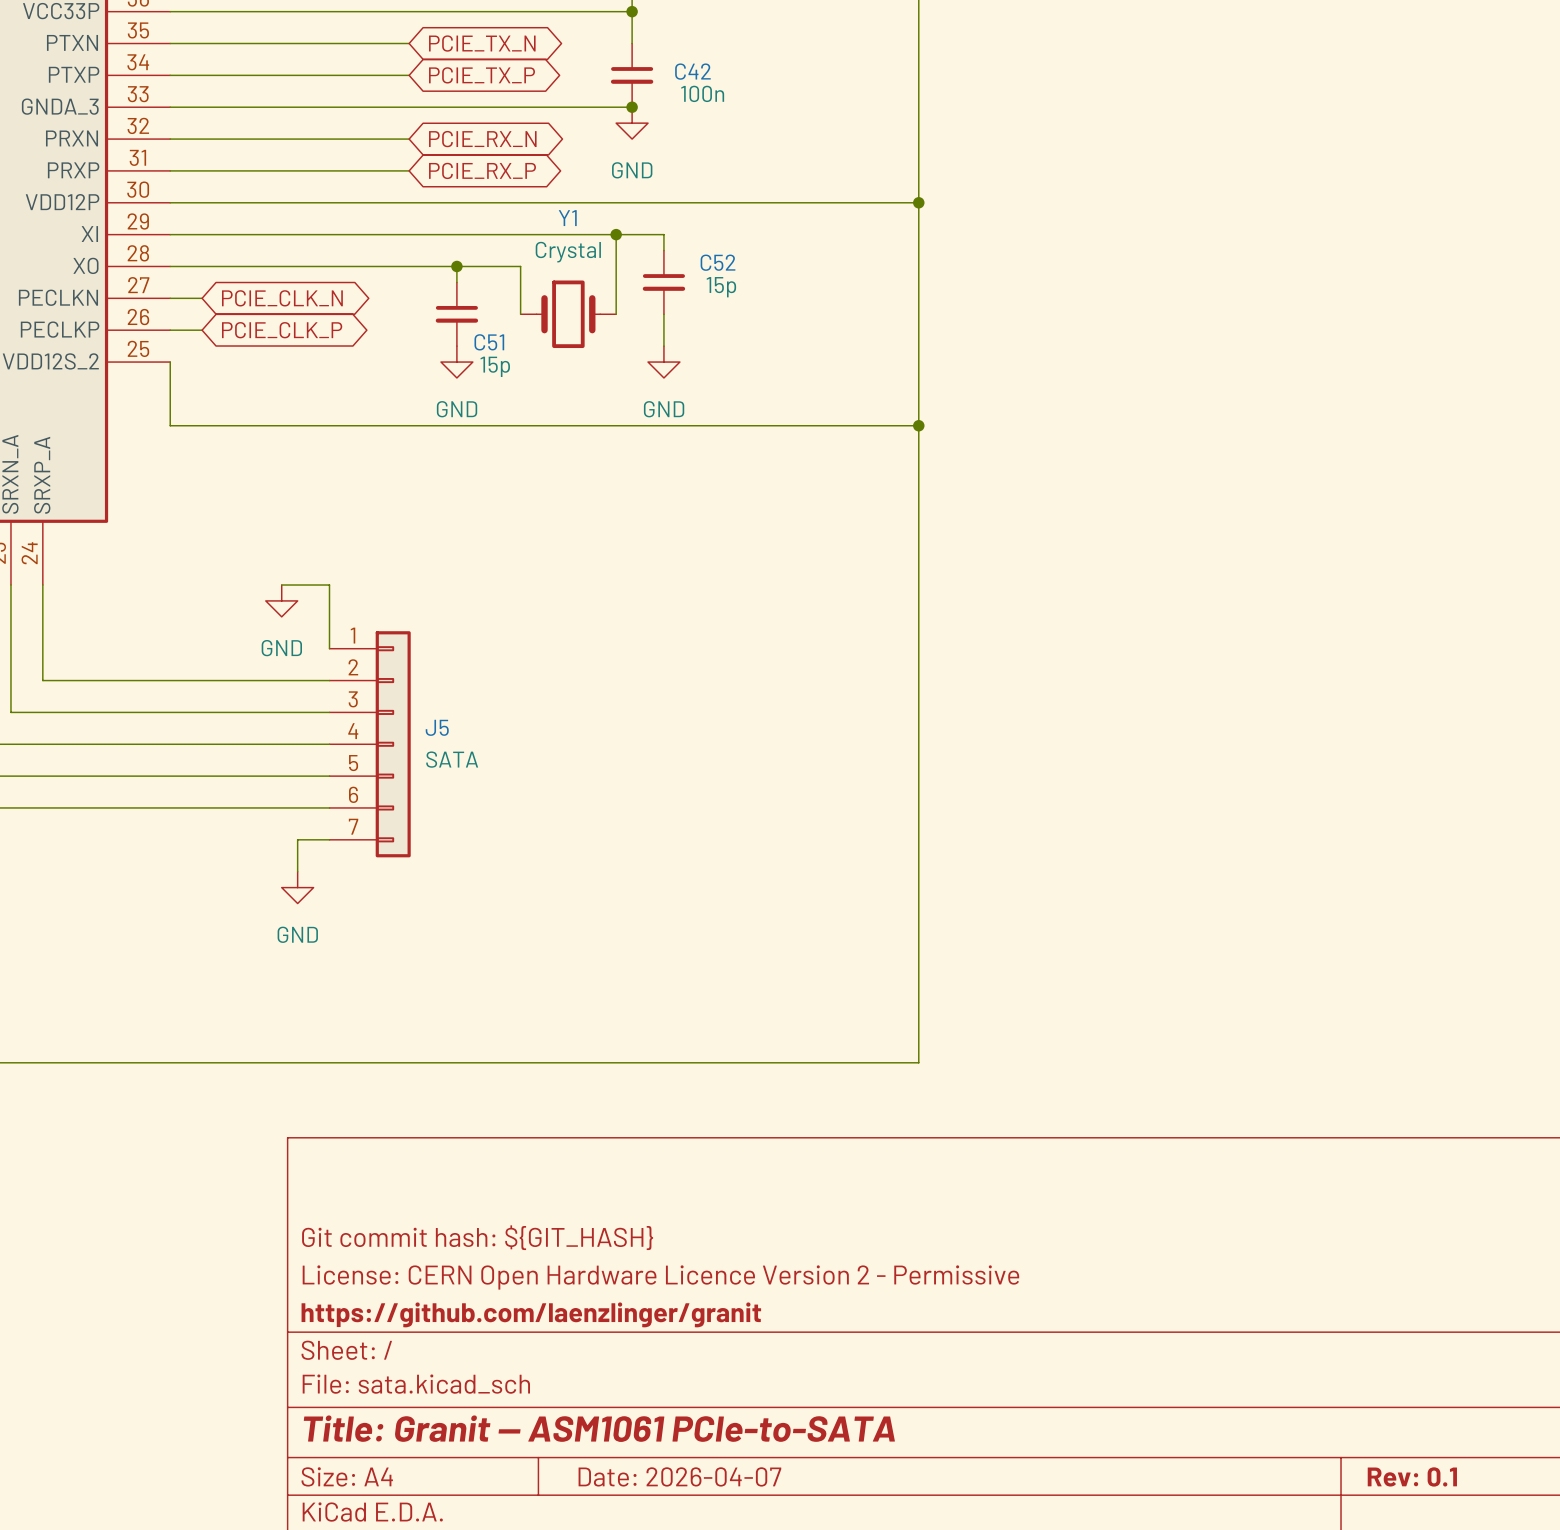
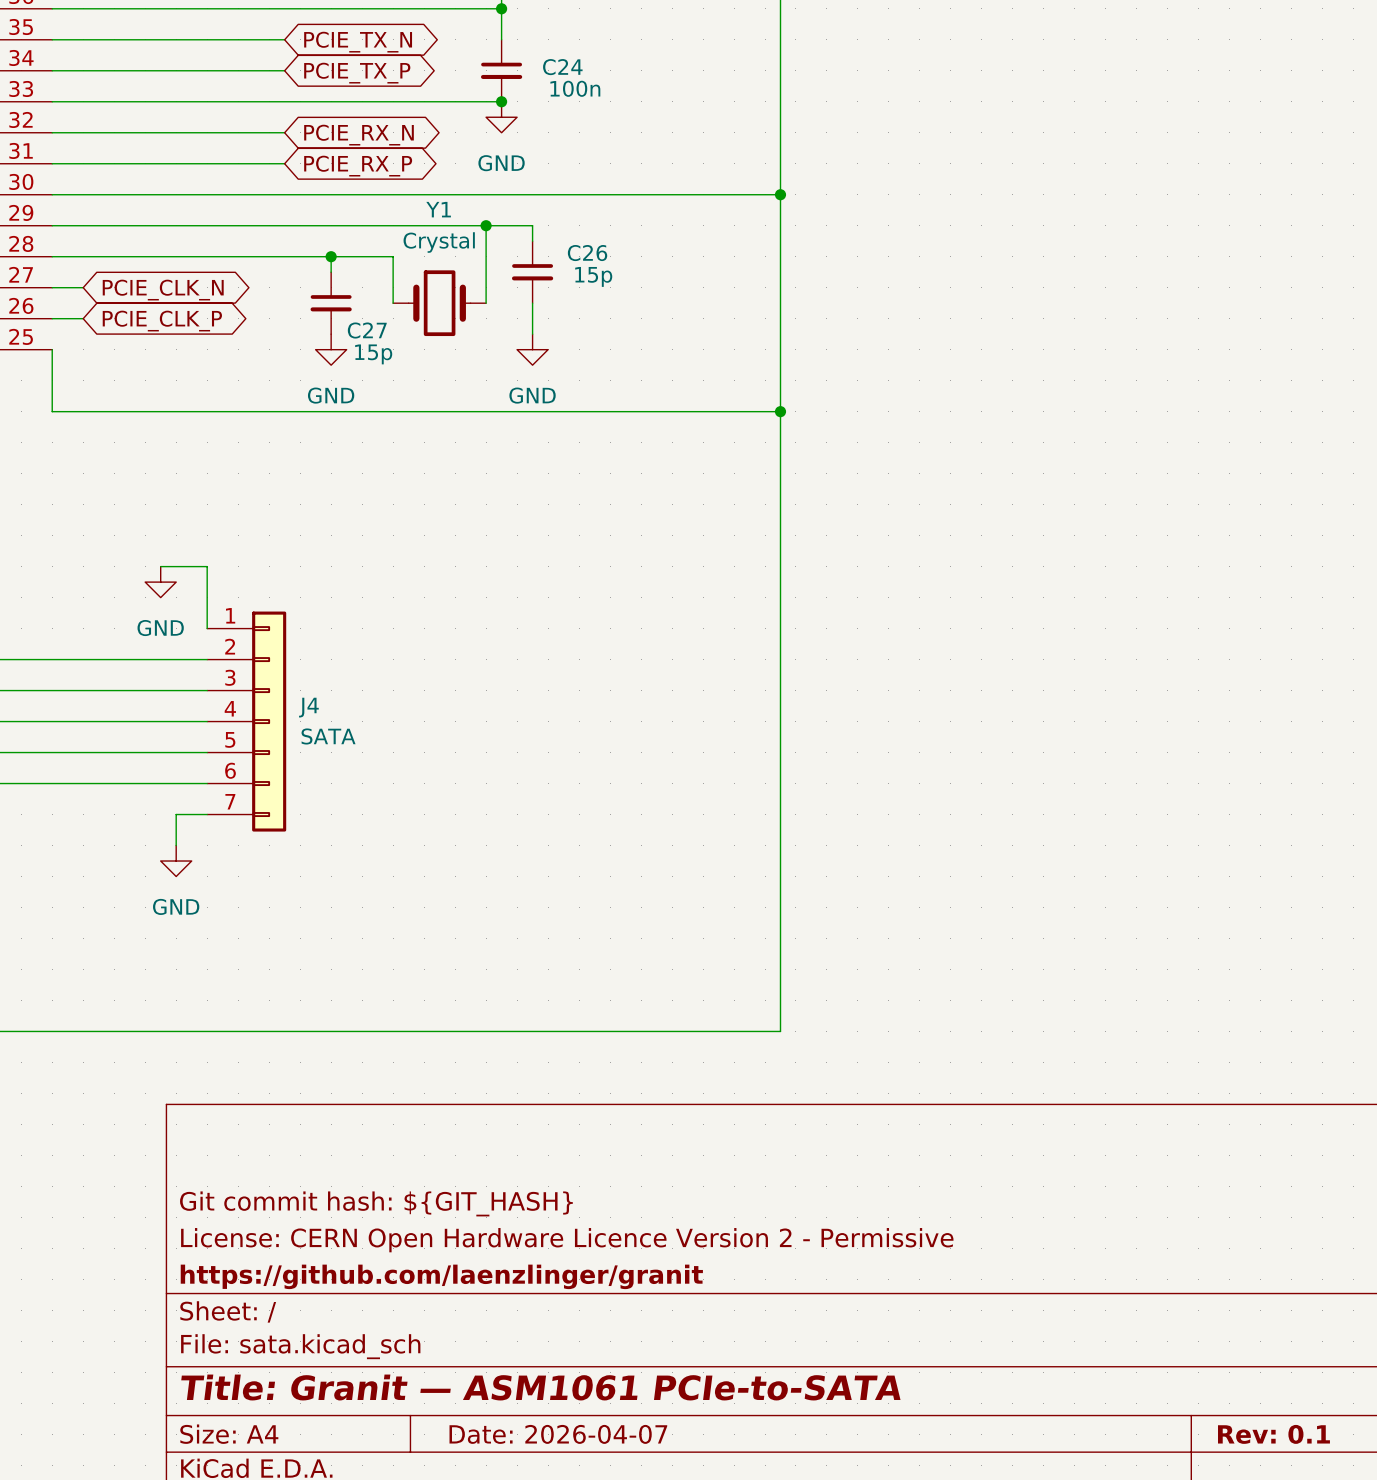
C42 name: C42 (692, 71) -> C24 (562, 67)
C52 name: C52 (718, 262) -> C26 (587, 253)
C51 name: C51 (489, 342) -> C27 (367, 330)
J5 name: J5 (437, 727) -> J4 (308, 707)

